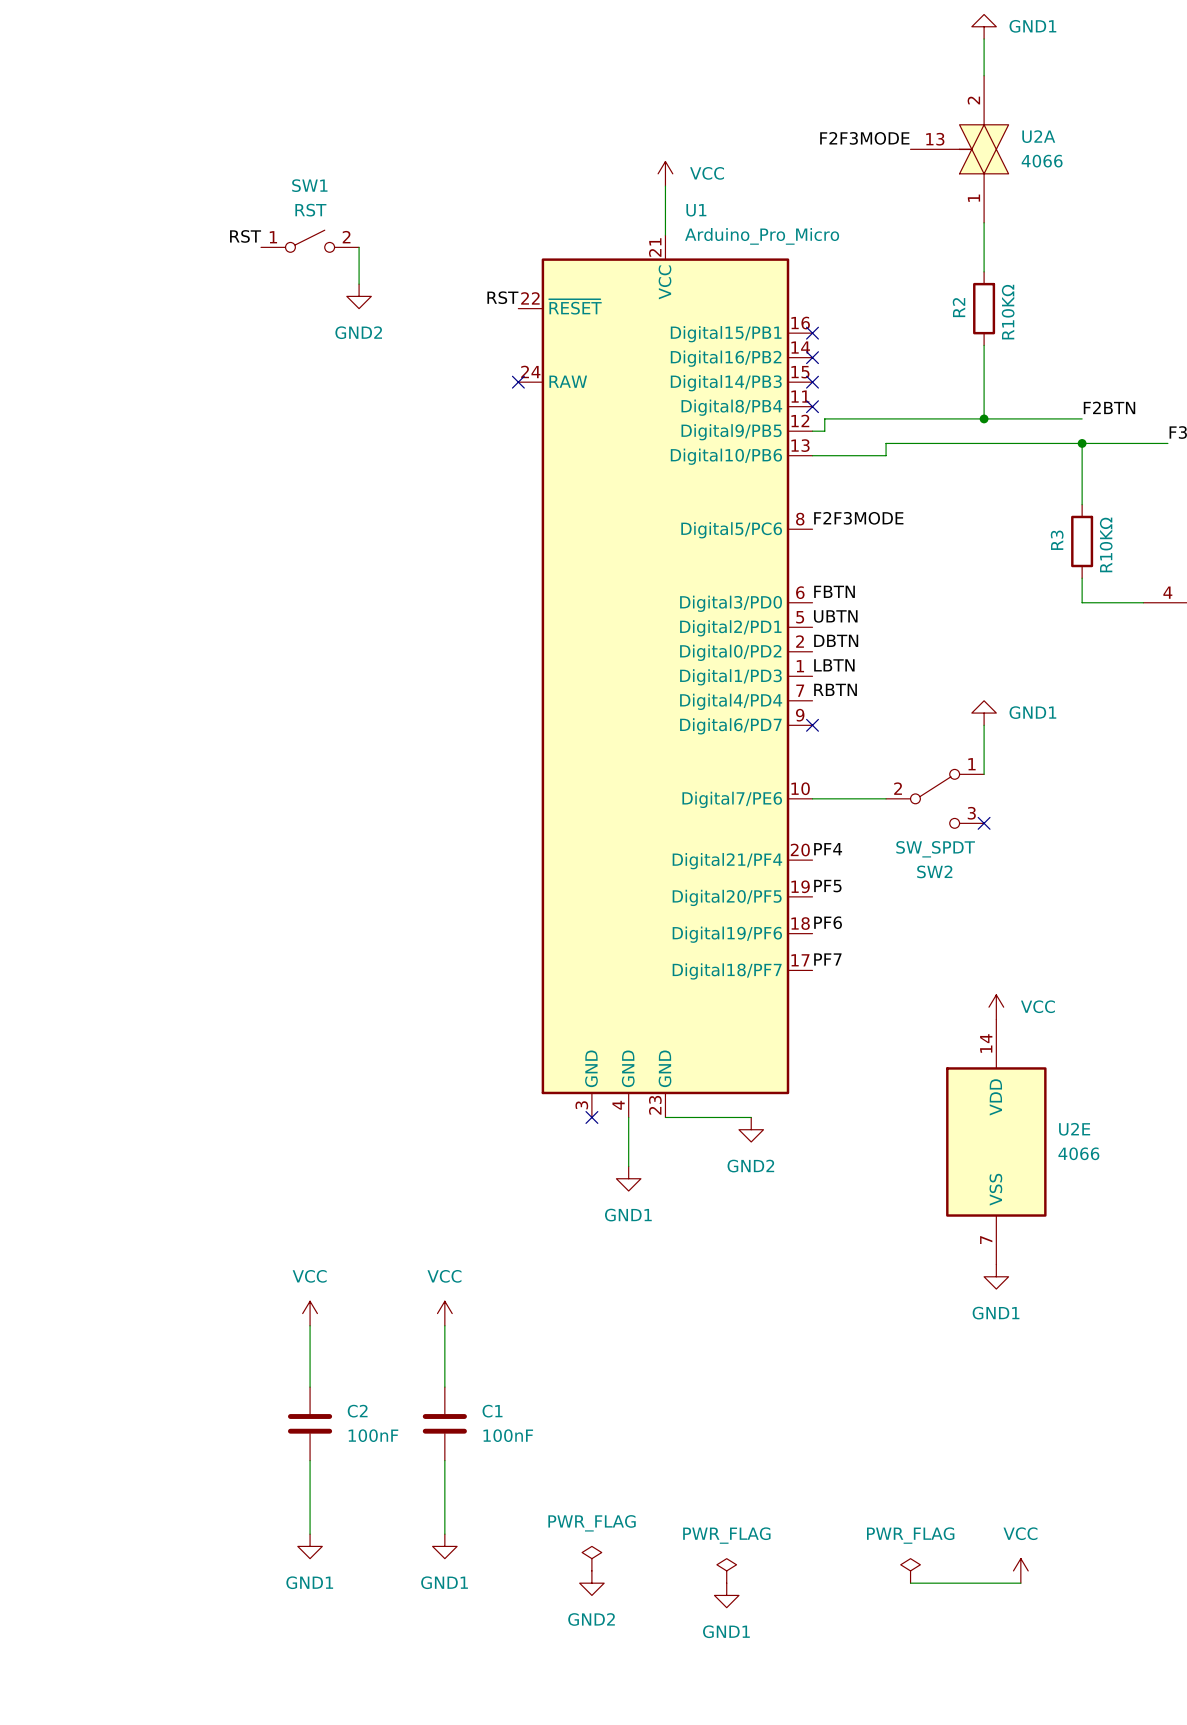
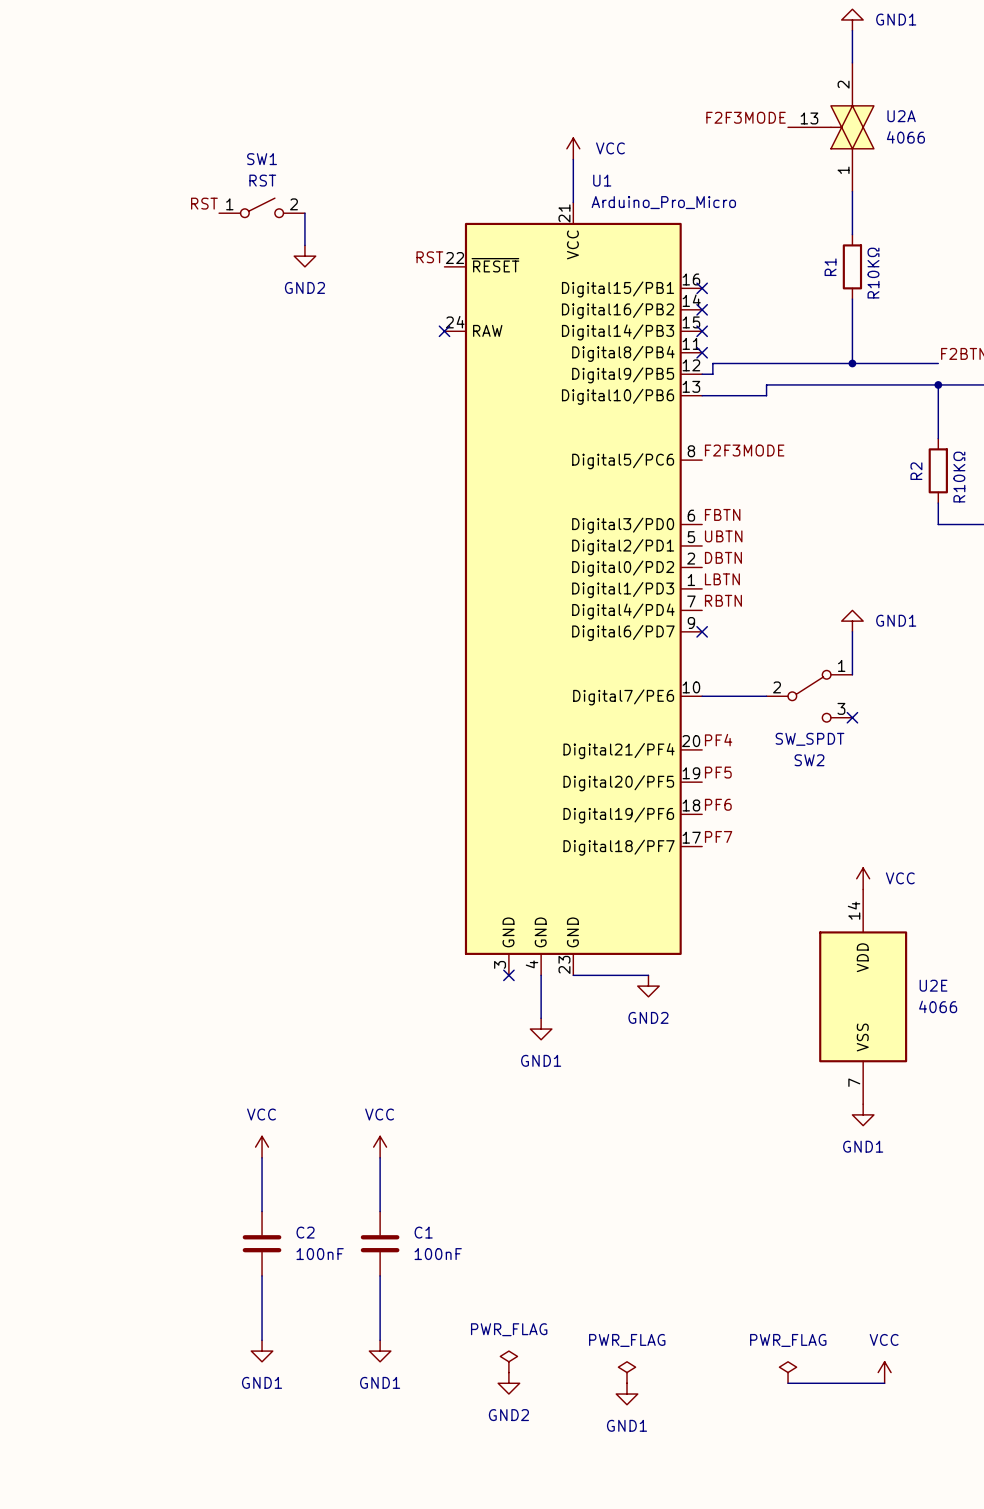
R2 name: R2 (959, 307) -> R1 (830, 267)
R3 name: R3 (1057, 540) -> R2 (916, 471)

